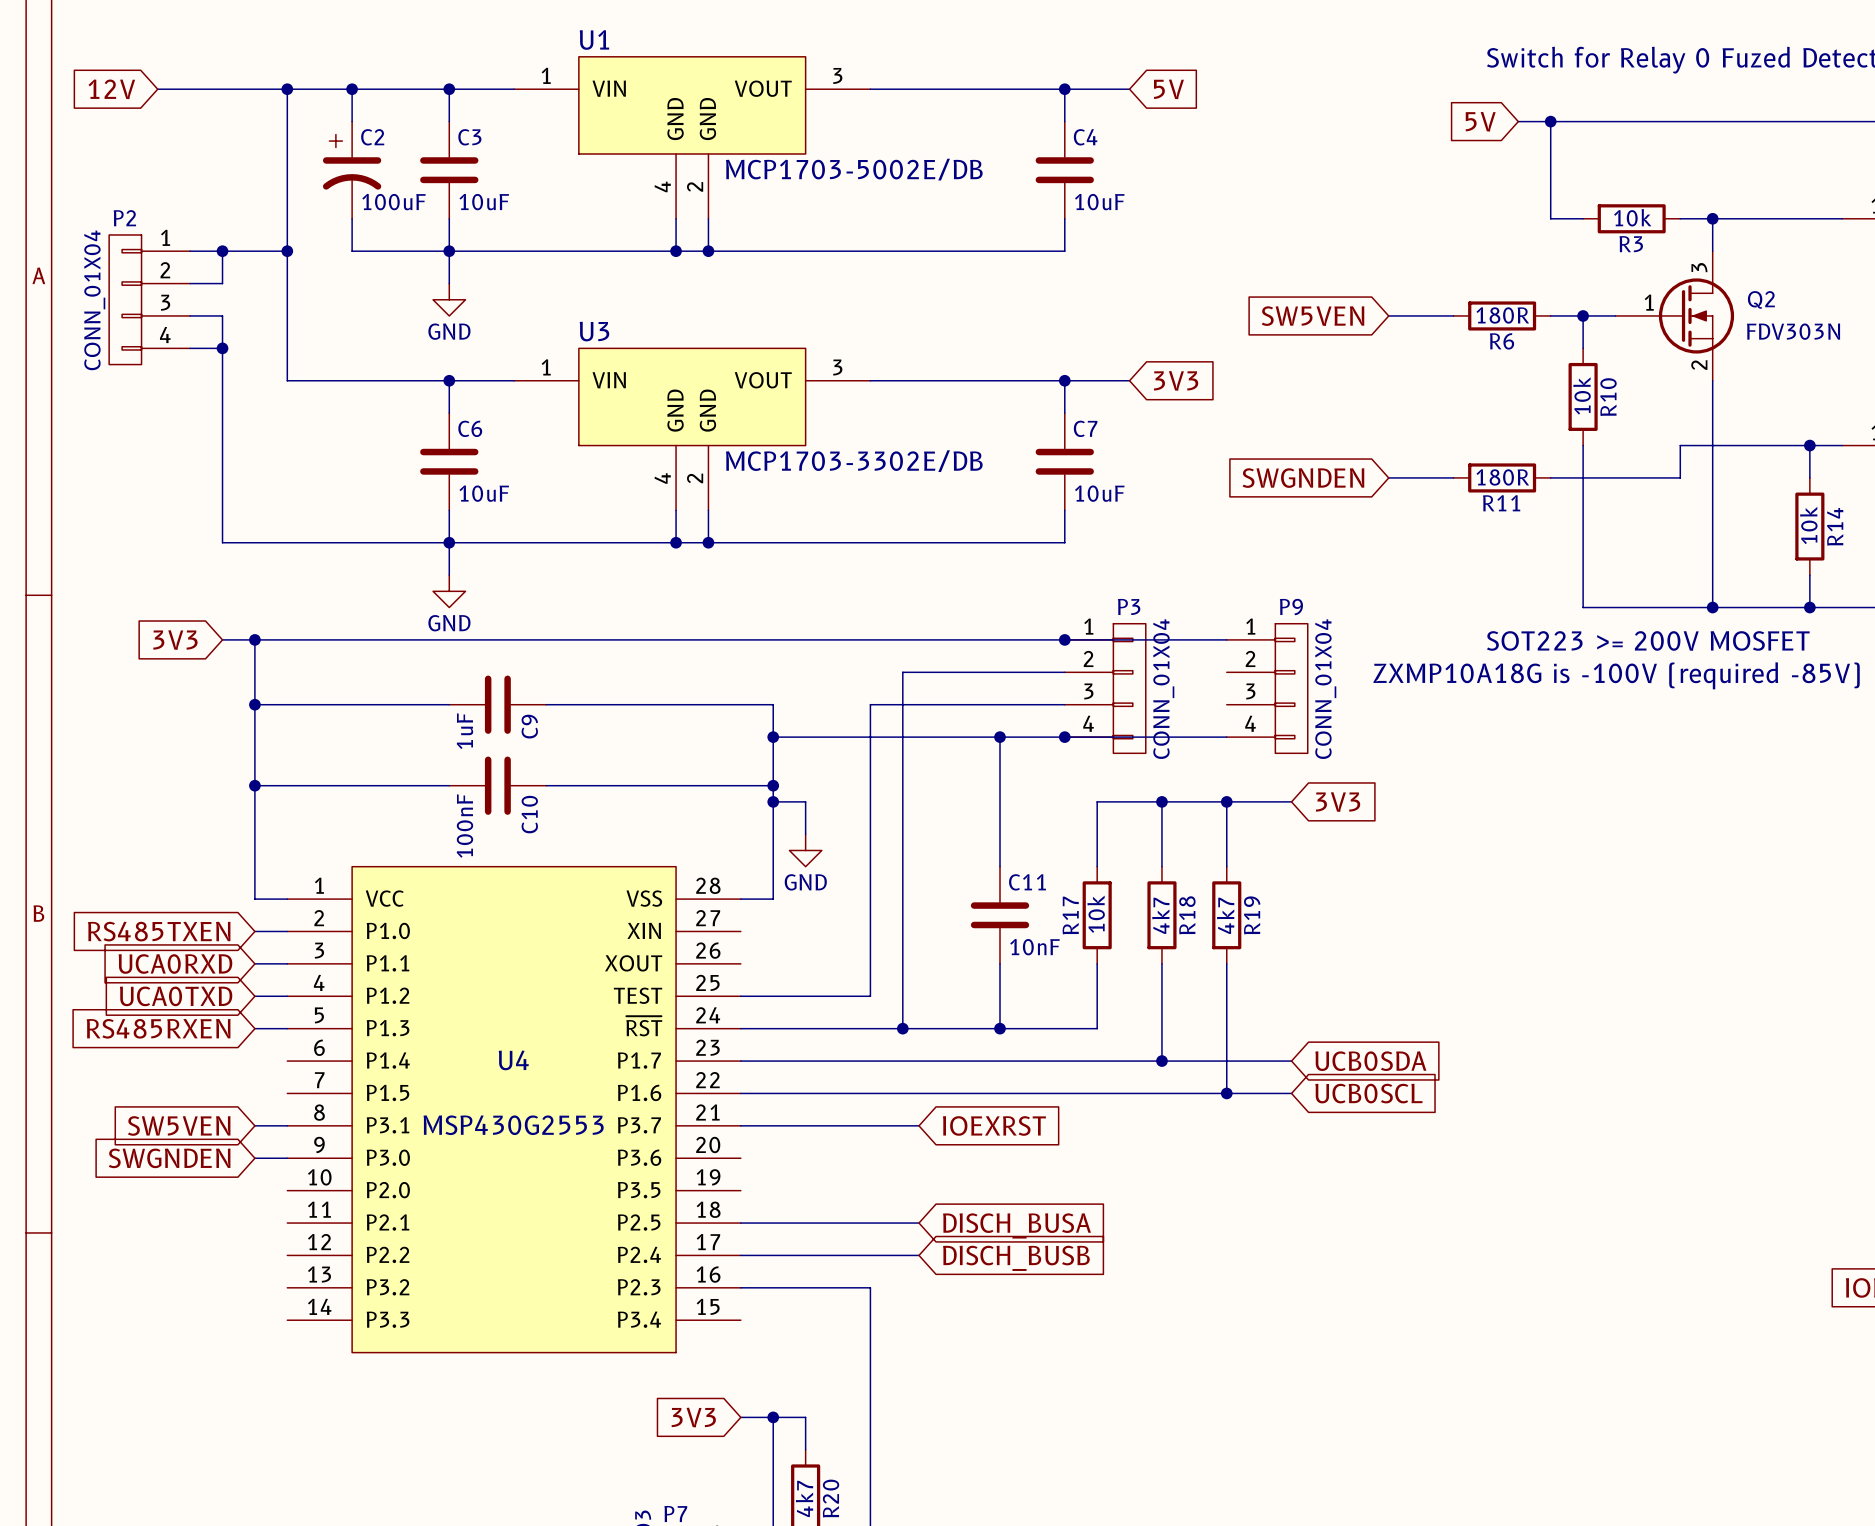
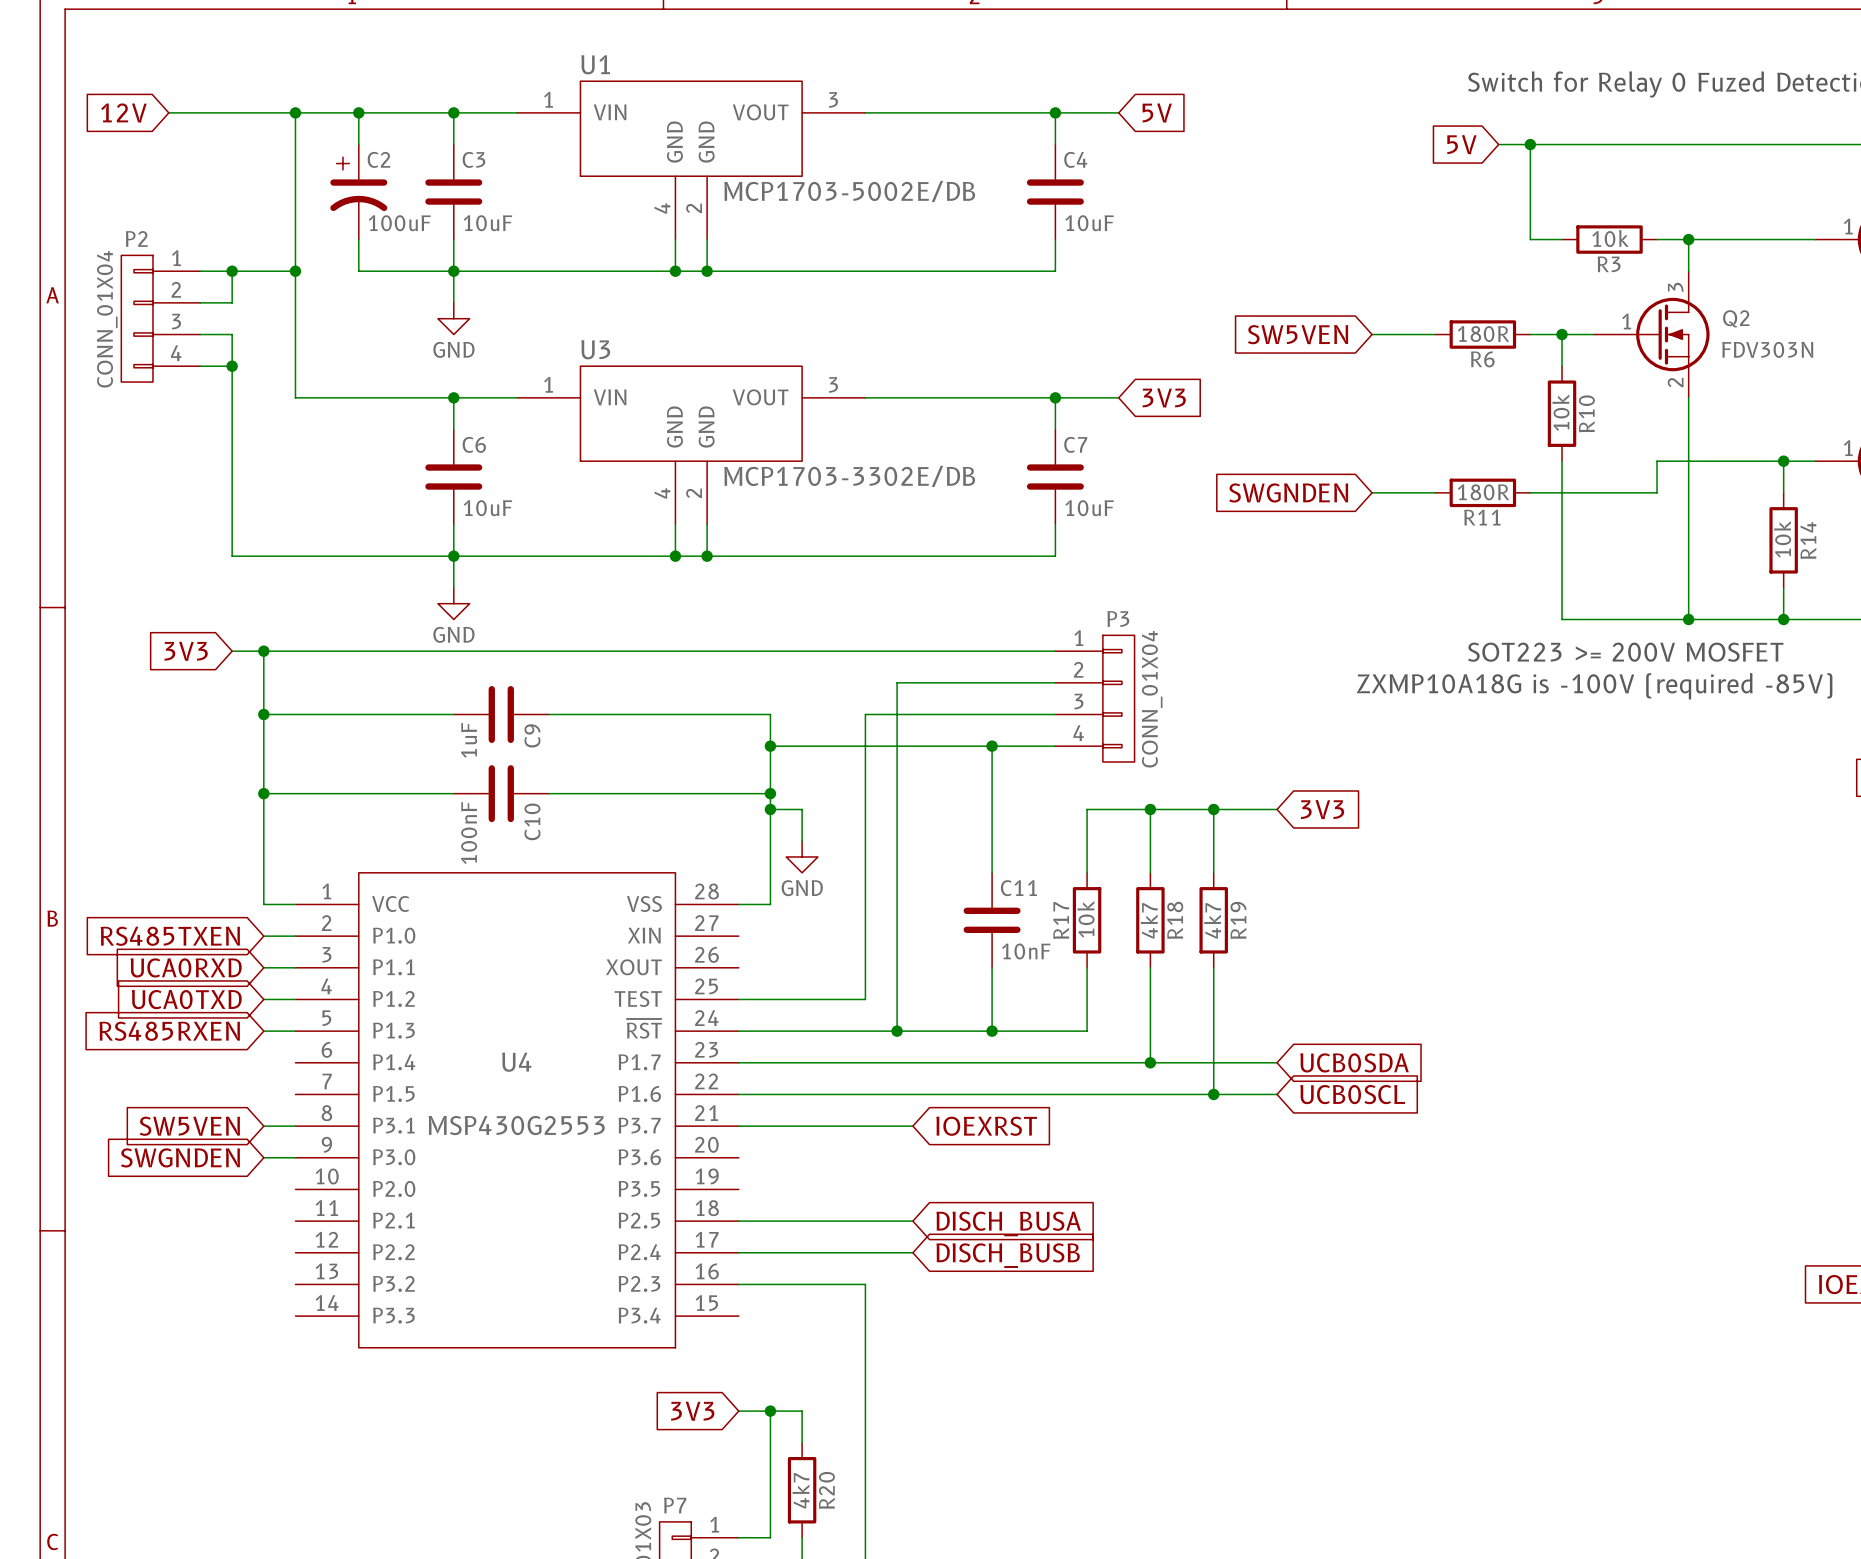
wire: (1064, 639) (1226, 639) -> none
junction: (1064, 639) -> none
P9: CONN_01X04 (1267, 688) -> none
wire: (1064, 737) (1226, 737) -> none
junction: (1064, 737) -> none

